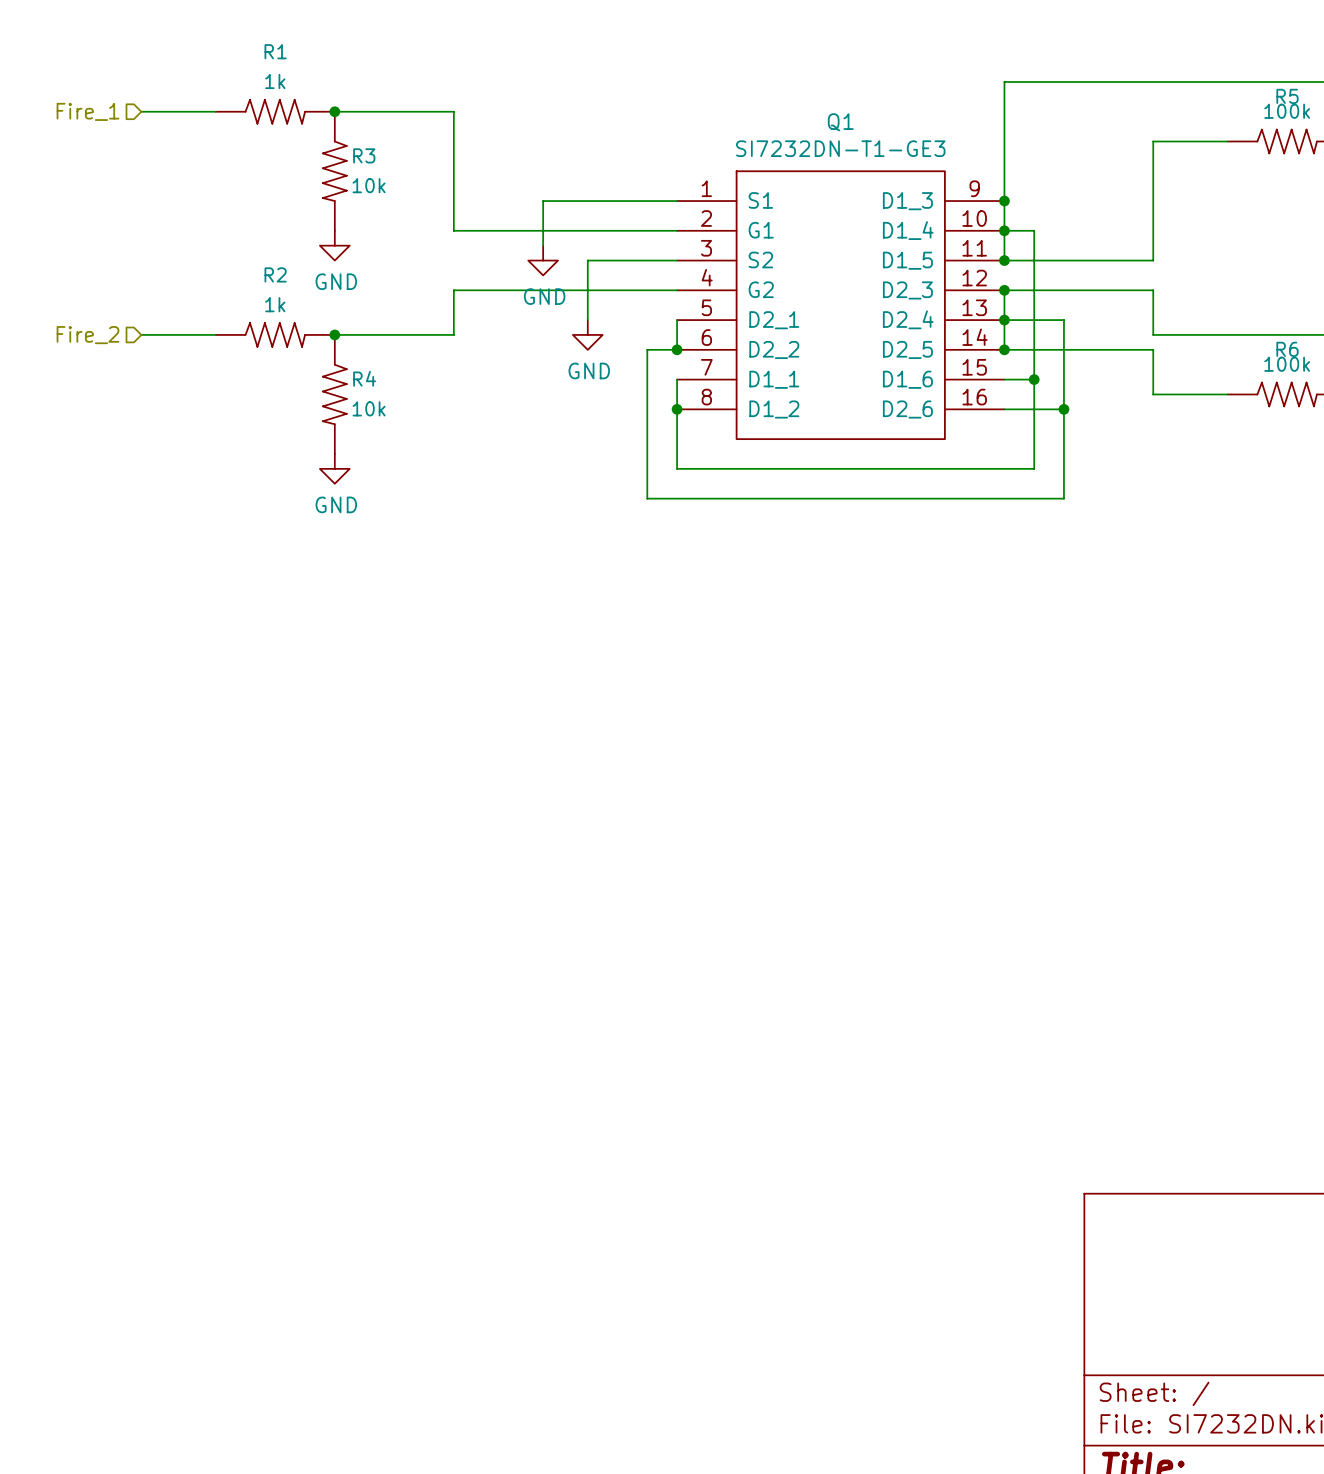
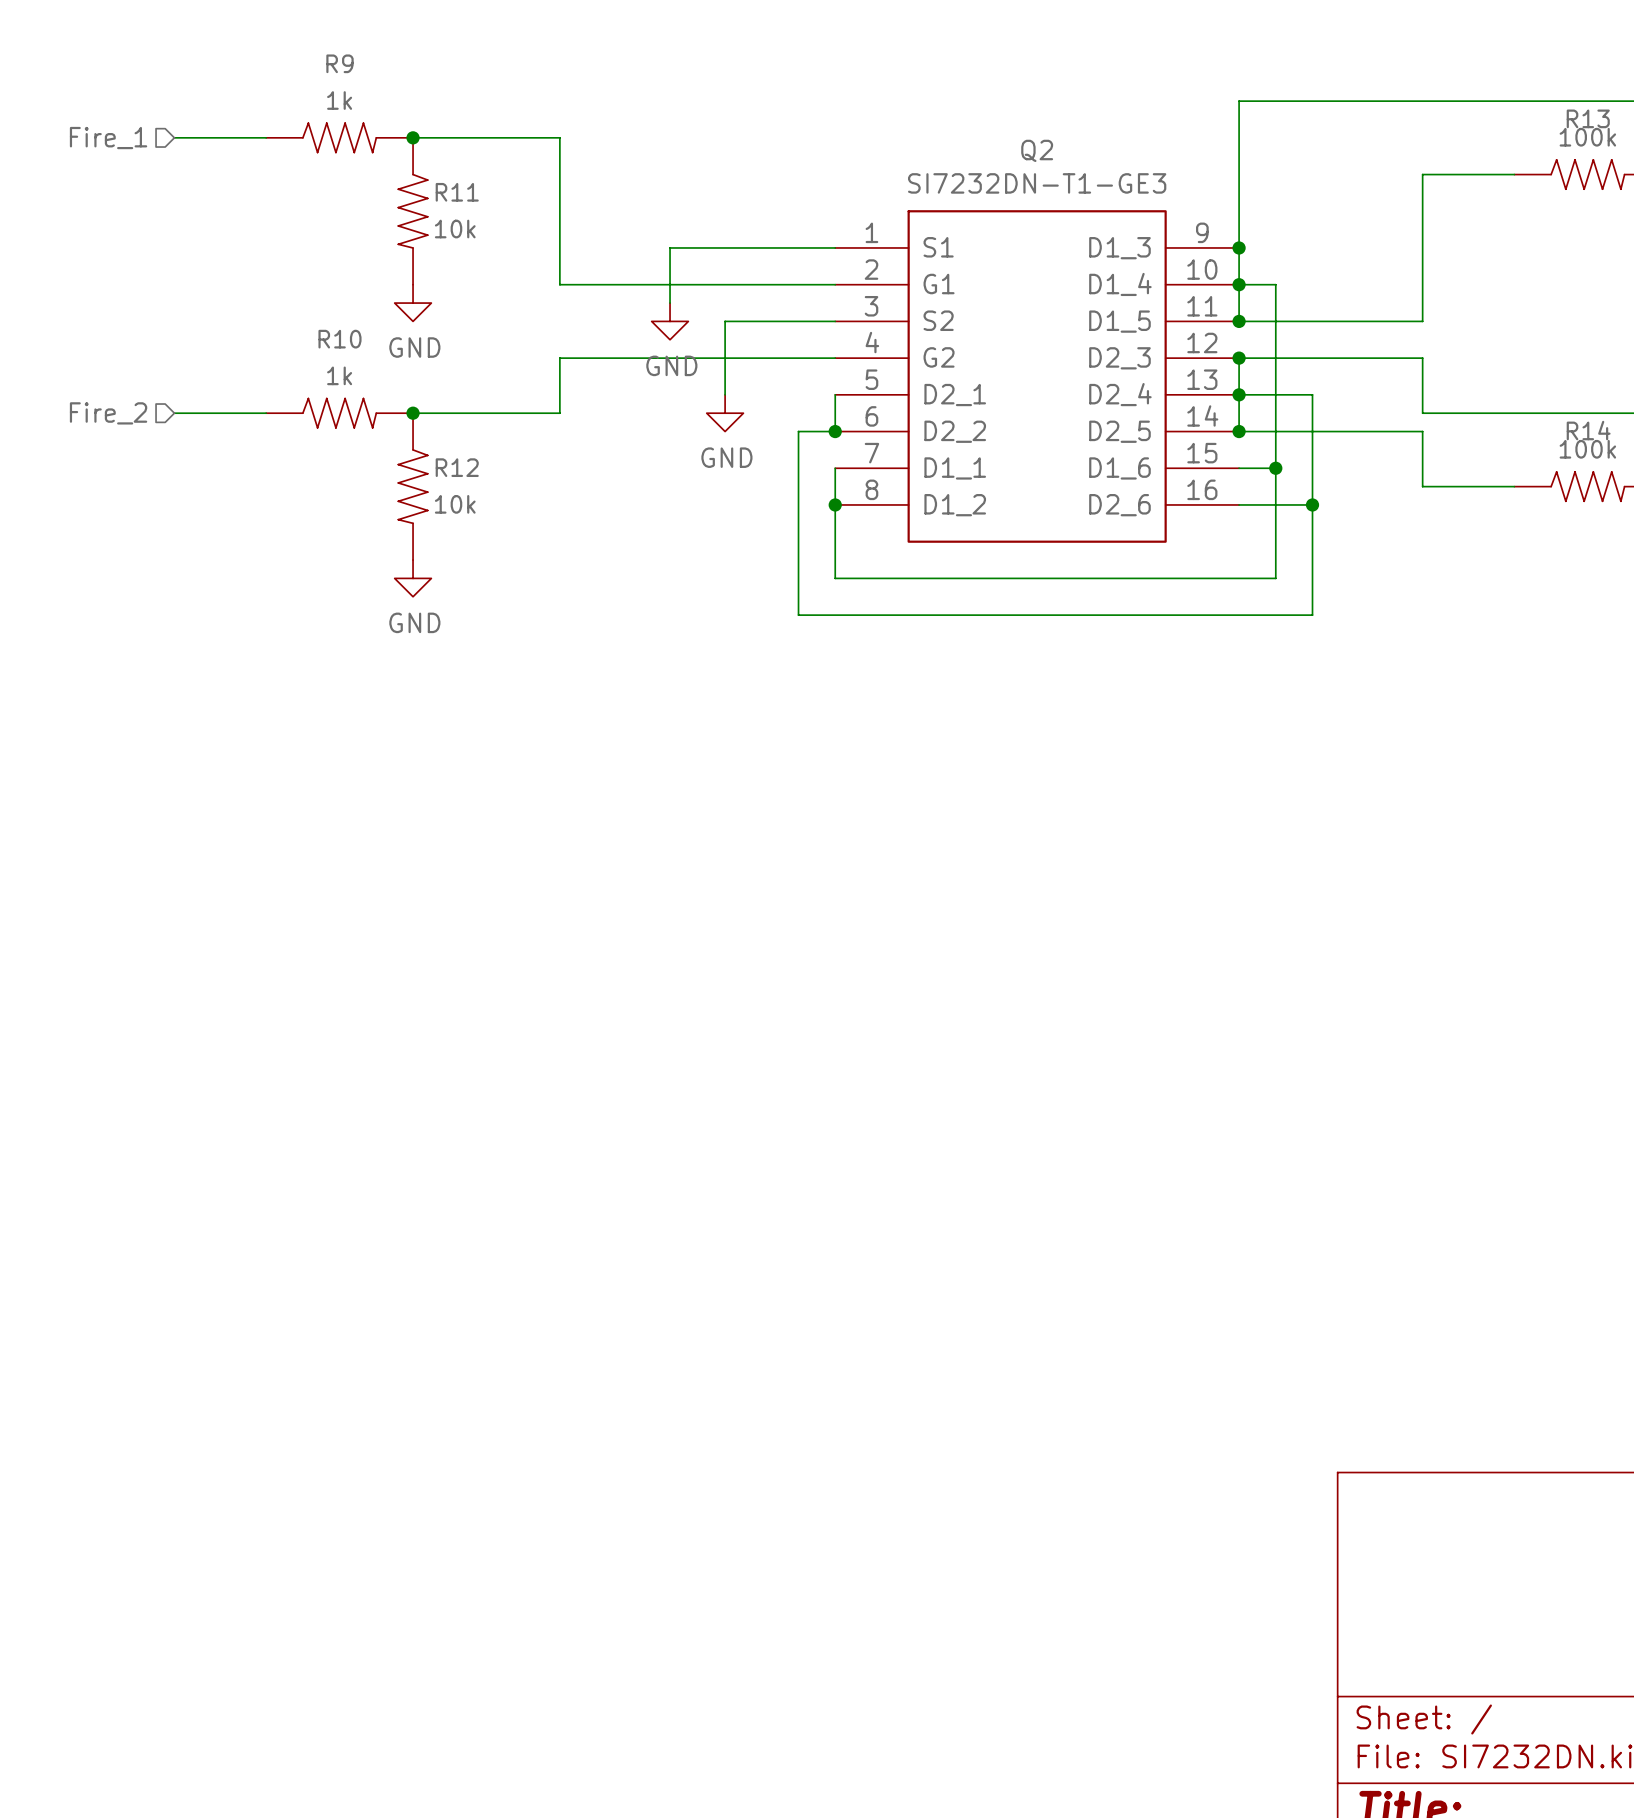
R1 name: R1 (275, 51) -> R9 (340, 63)
R5 name: R5 (1287, 96) -> R13 (1588, 118)
Q1 name: Q1 (840, 122) -> Q2 (1037, 150)
R3 name: R3 (364, 155) -> R11 (457, 192)
R2 name: R2 (275, 274) -> R10 (340, 339)
R6 name: R6 (1287, 349) -> R14 (1588, 430)
R4 name: R4 (364, 378) -> R12 (457, 467)

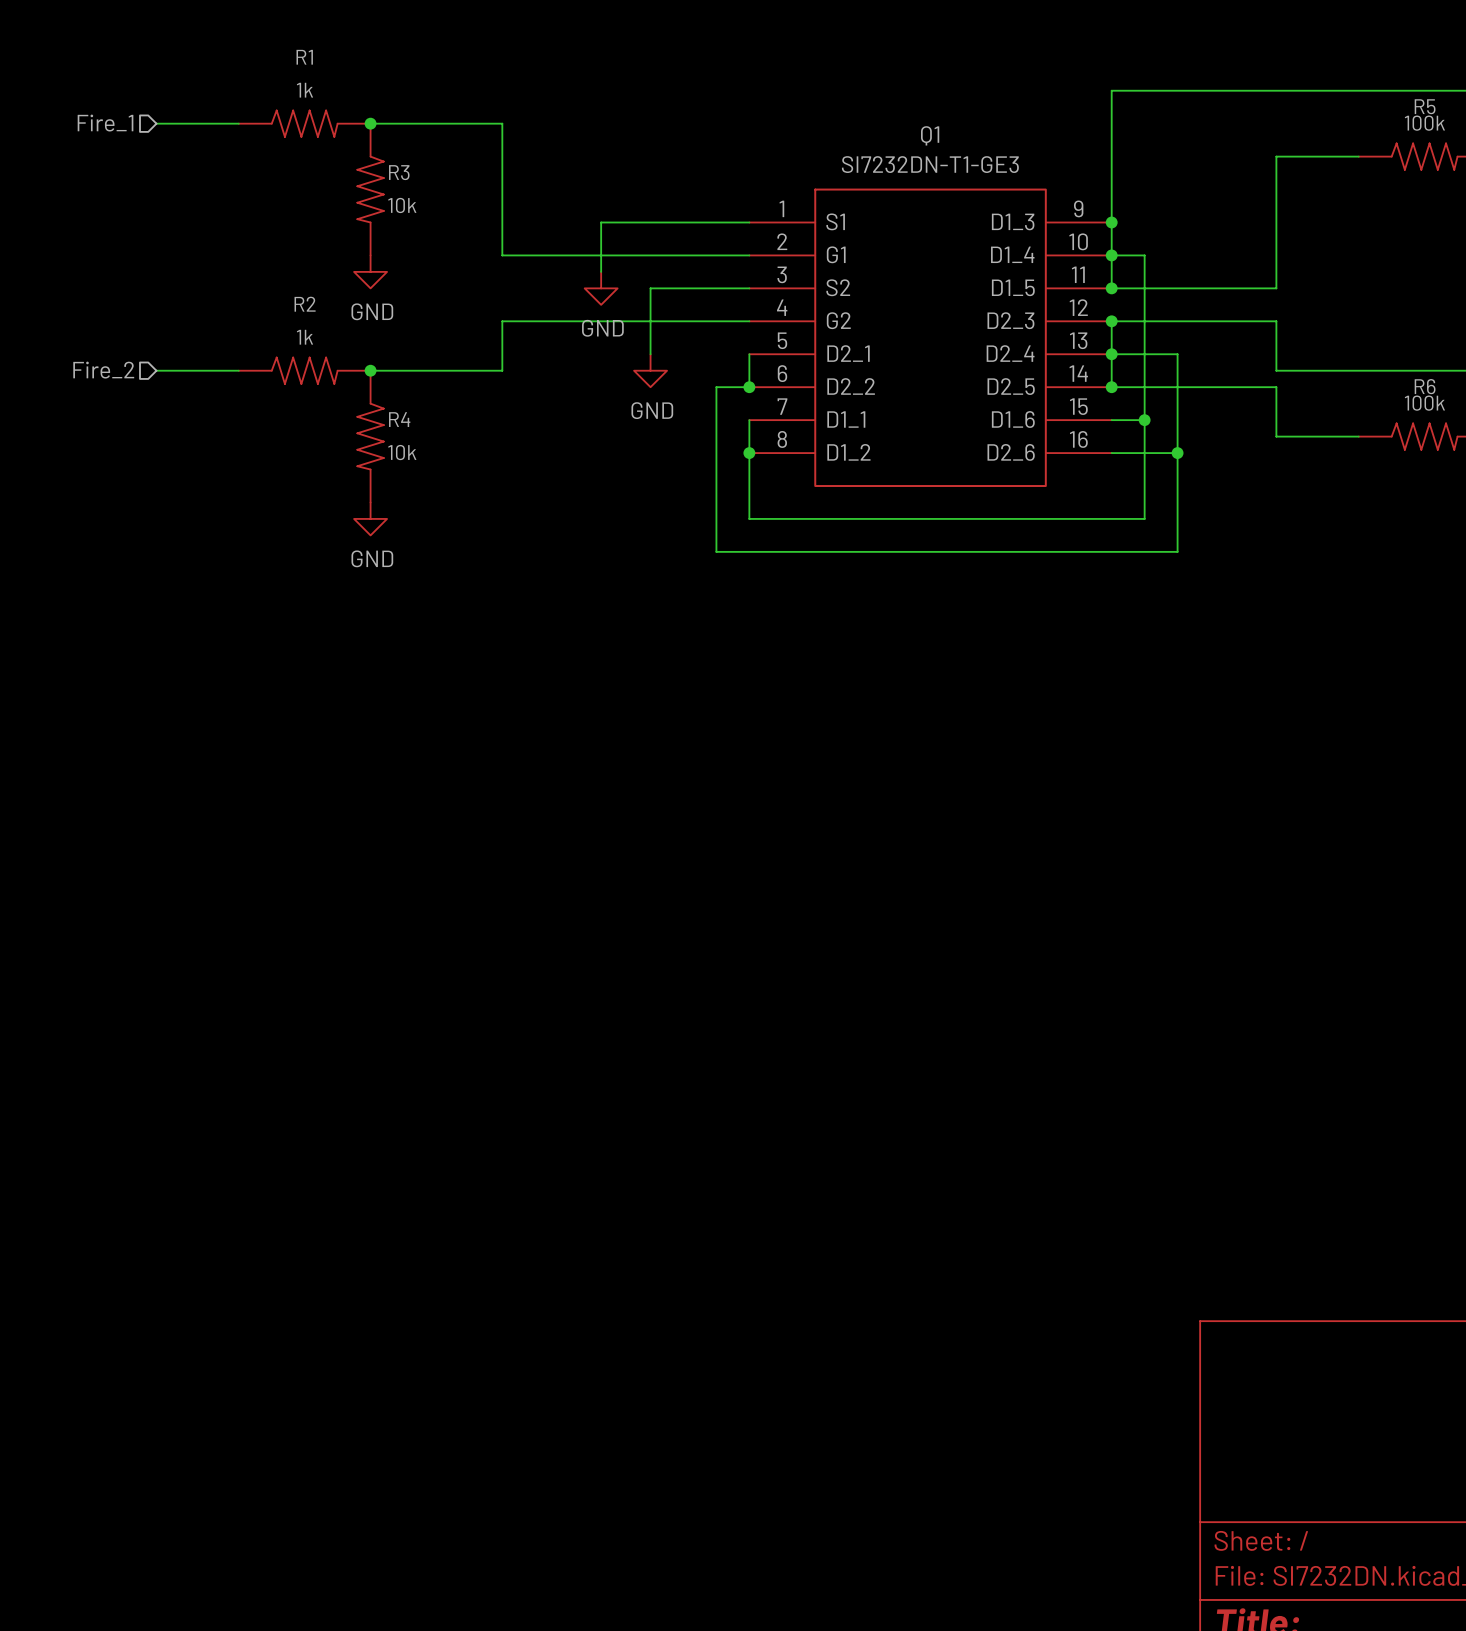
R9 name: R9 (340, 63) -> R1 (304, 57)
R13 name: R13 (1588, 118) -> R5 (1425, 106)
Q2 name: Q2 (1037, 150) -> Q1 (930, 135)
R11 name: R11 (457, 192) -> R3 (399, 172)
R10 name: R10 (340, 339) -> R2 (305, 304)
R14 name: R14 (1588, 430) -> R6 (1425, 386)
R12 name: R12 (457, 467) -> R4 (399, 419)

